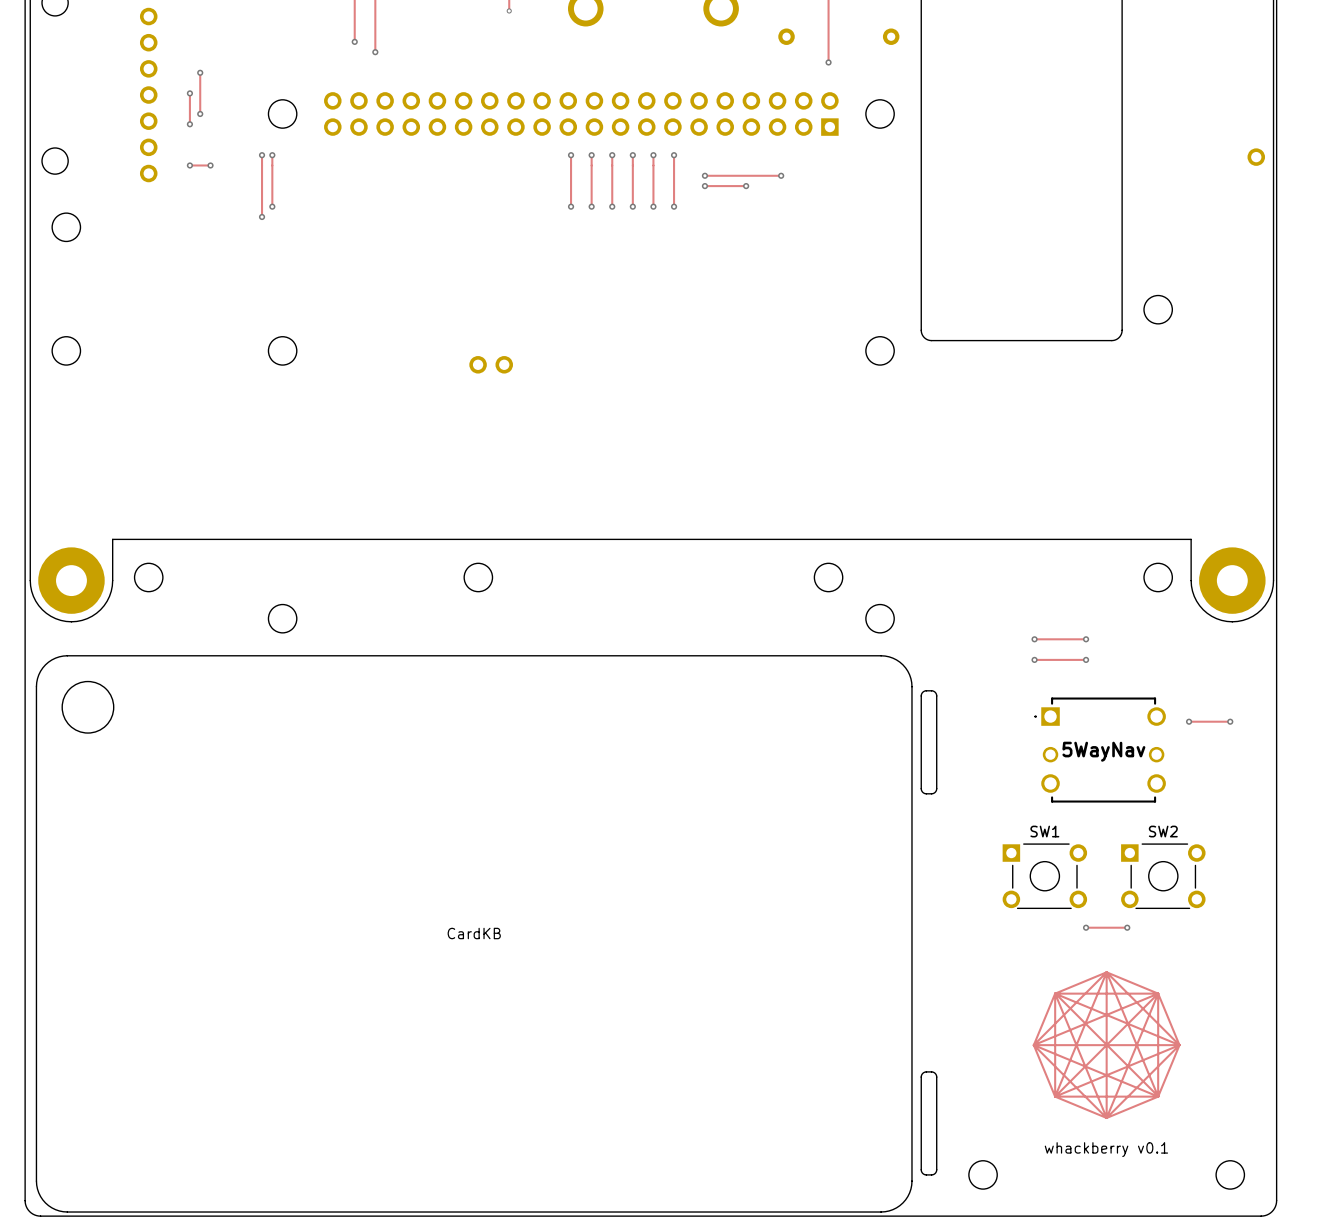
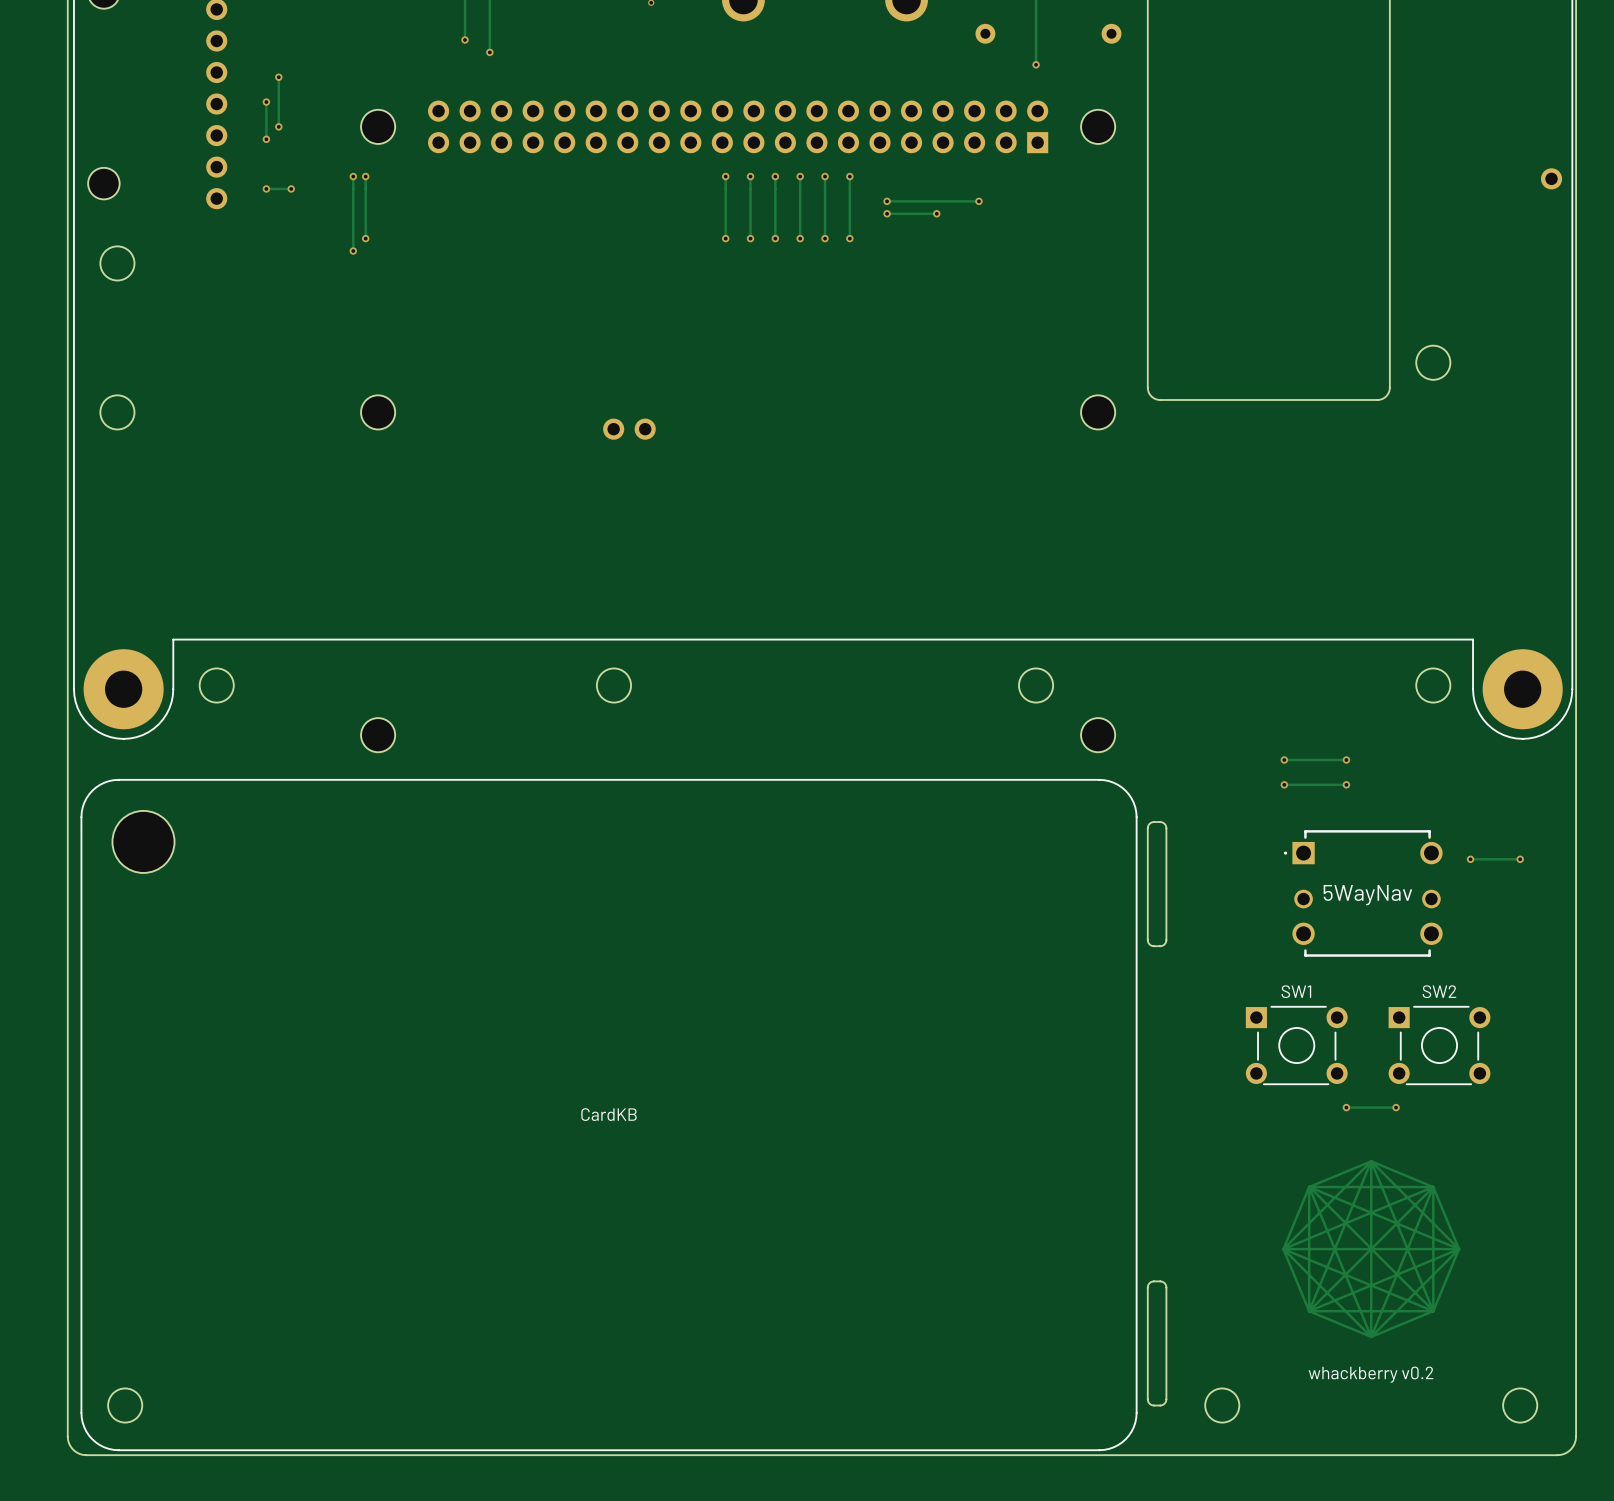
text: whackberry v0.1 (1106, 1149) -> whackberry v0.2 (1370, 1374)
round board edge: none -> [107, 1388, 143, 1423]

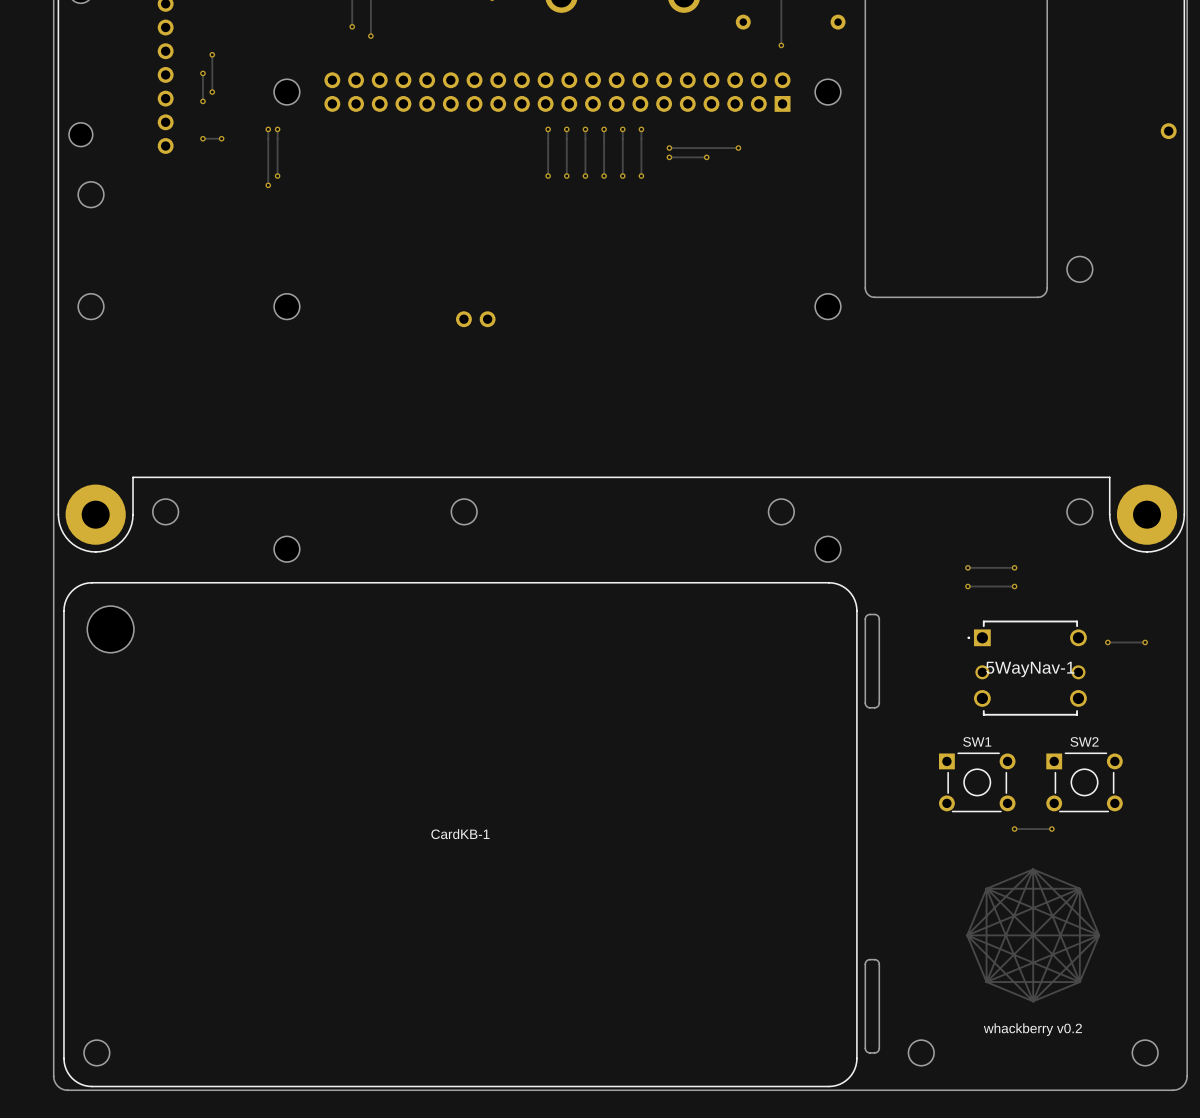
5WayNav name: 5WayNav (1367, 895) -> 5WayNav-1 (1030, 669)
CardKB name: CardKB (609, 1114) -> CardKB-1 (460, 834)

